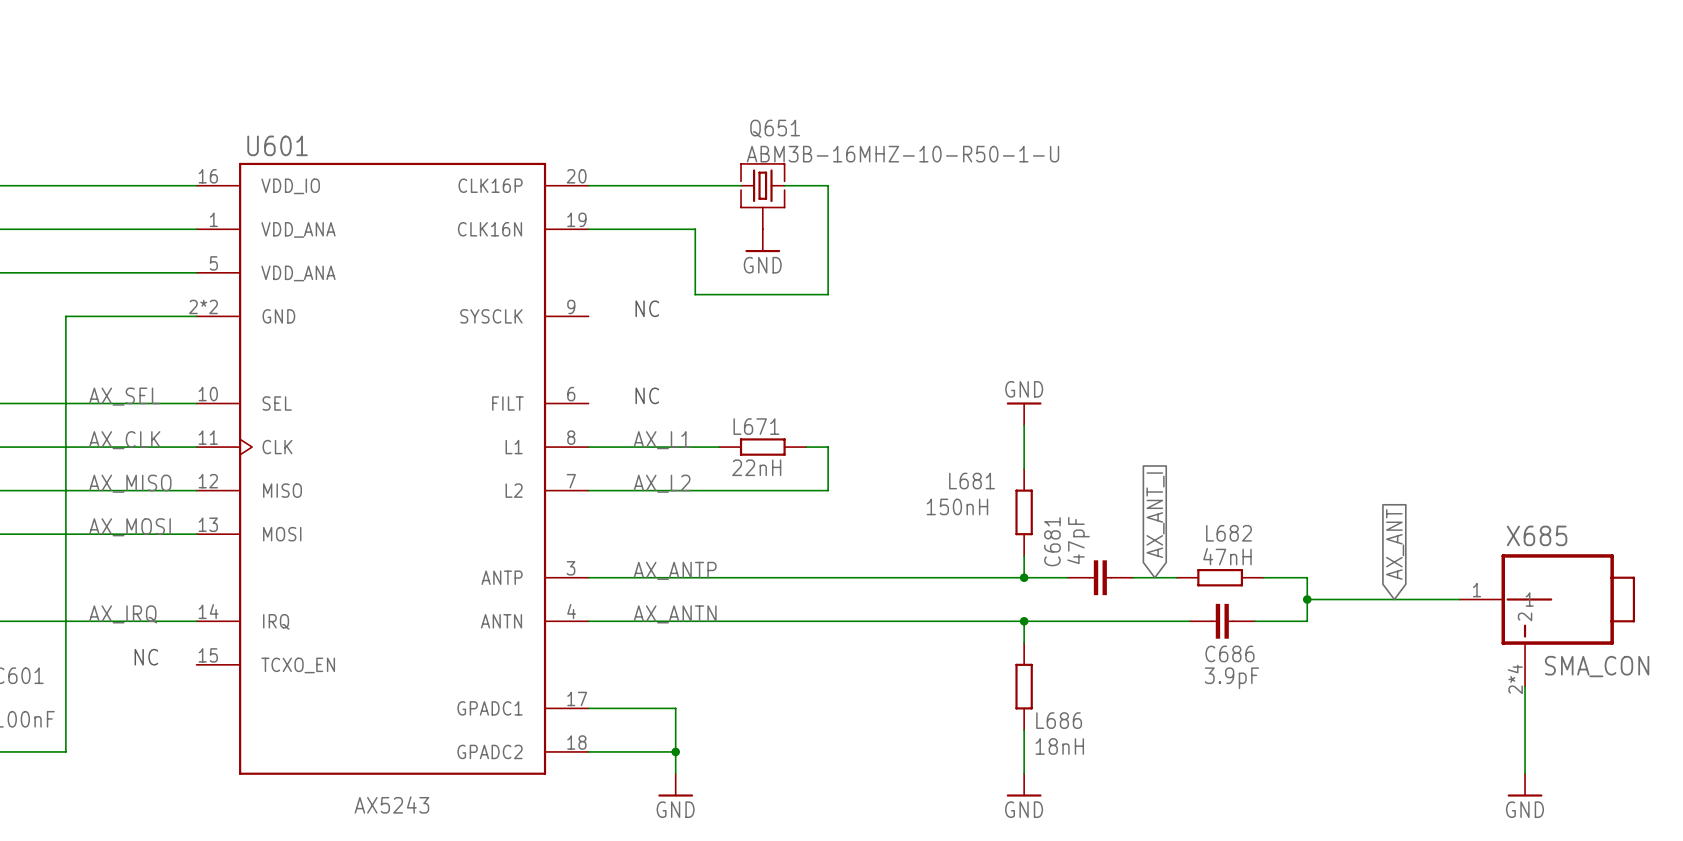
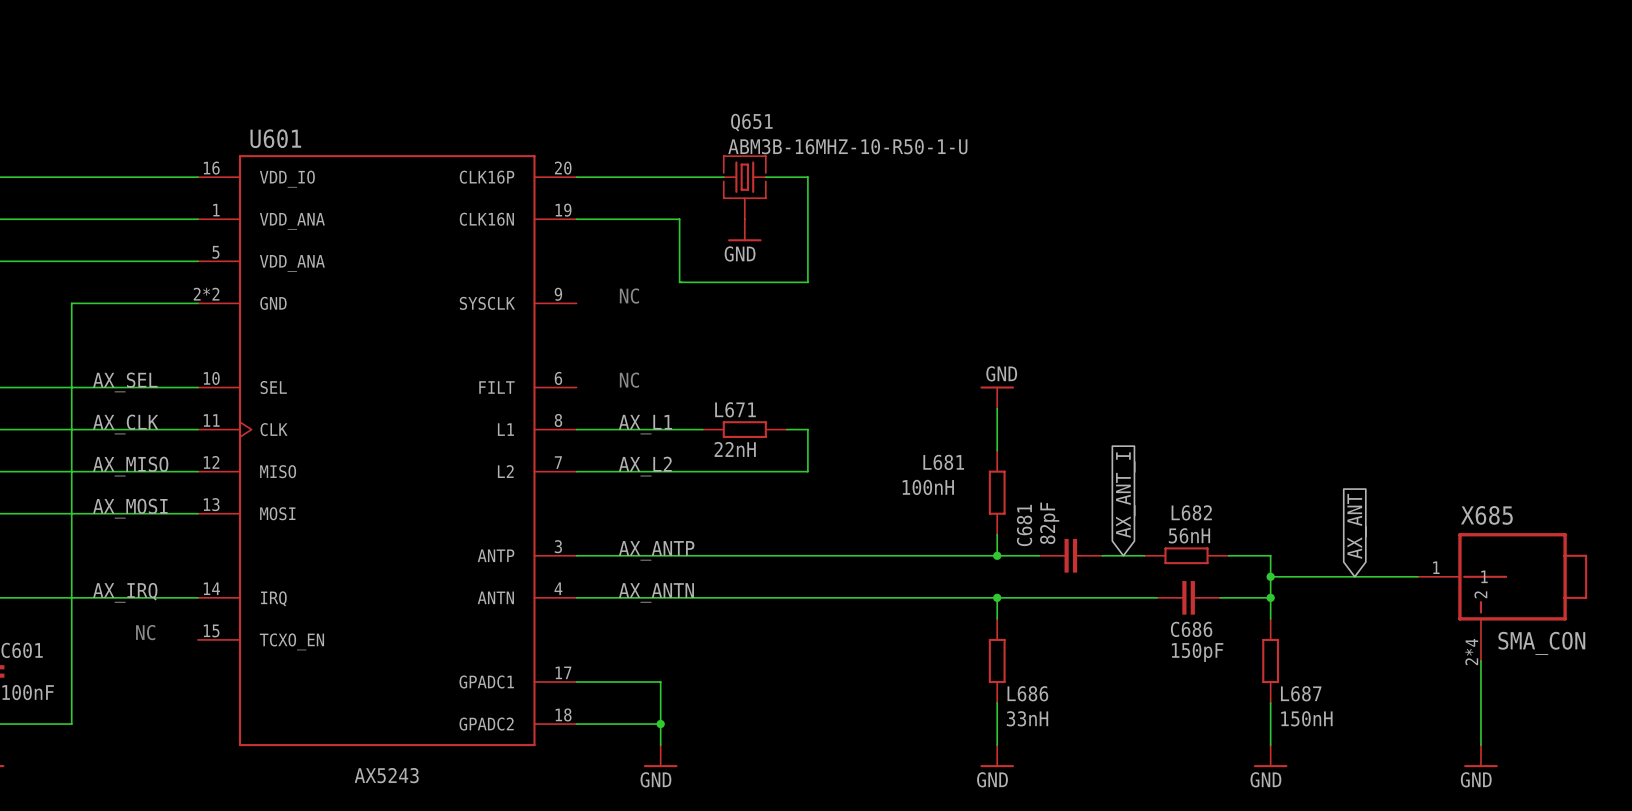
L681 value: 150nH (957, 506) -> 100nH (928, 487)
C681 value: 47pF (1078, 540) -> 82pF (1049, 523)
L682 value: 47nH (1227, 556) -> 56nH (1189, 535)
wire: none -> (1270, 597) (1270, 618)
junction: none -> (1270, 597)
C686 value: 3.9pF (1231, 678) -> 150pF (1197, 652)
L687: none -> 150nH (1270, 660)
wire: none -> (1270, 703) (1270, 745)
L686 value: 18nH (1059, 746) -> 33nH (1027, 718)
power symbol: none -> GND (1270, 756)

